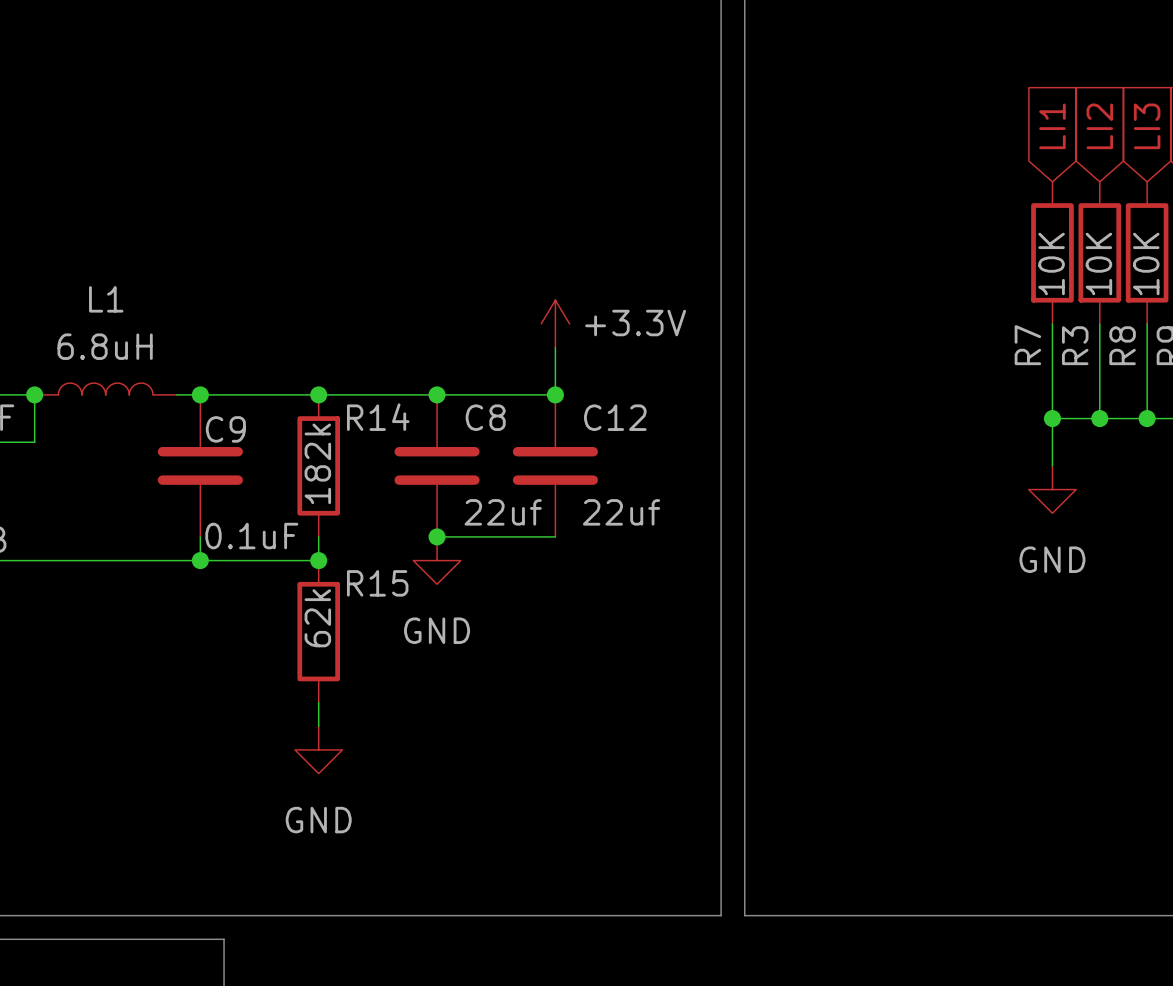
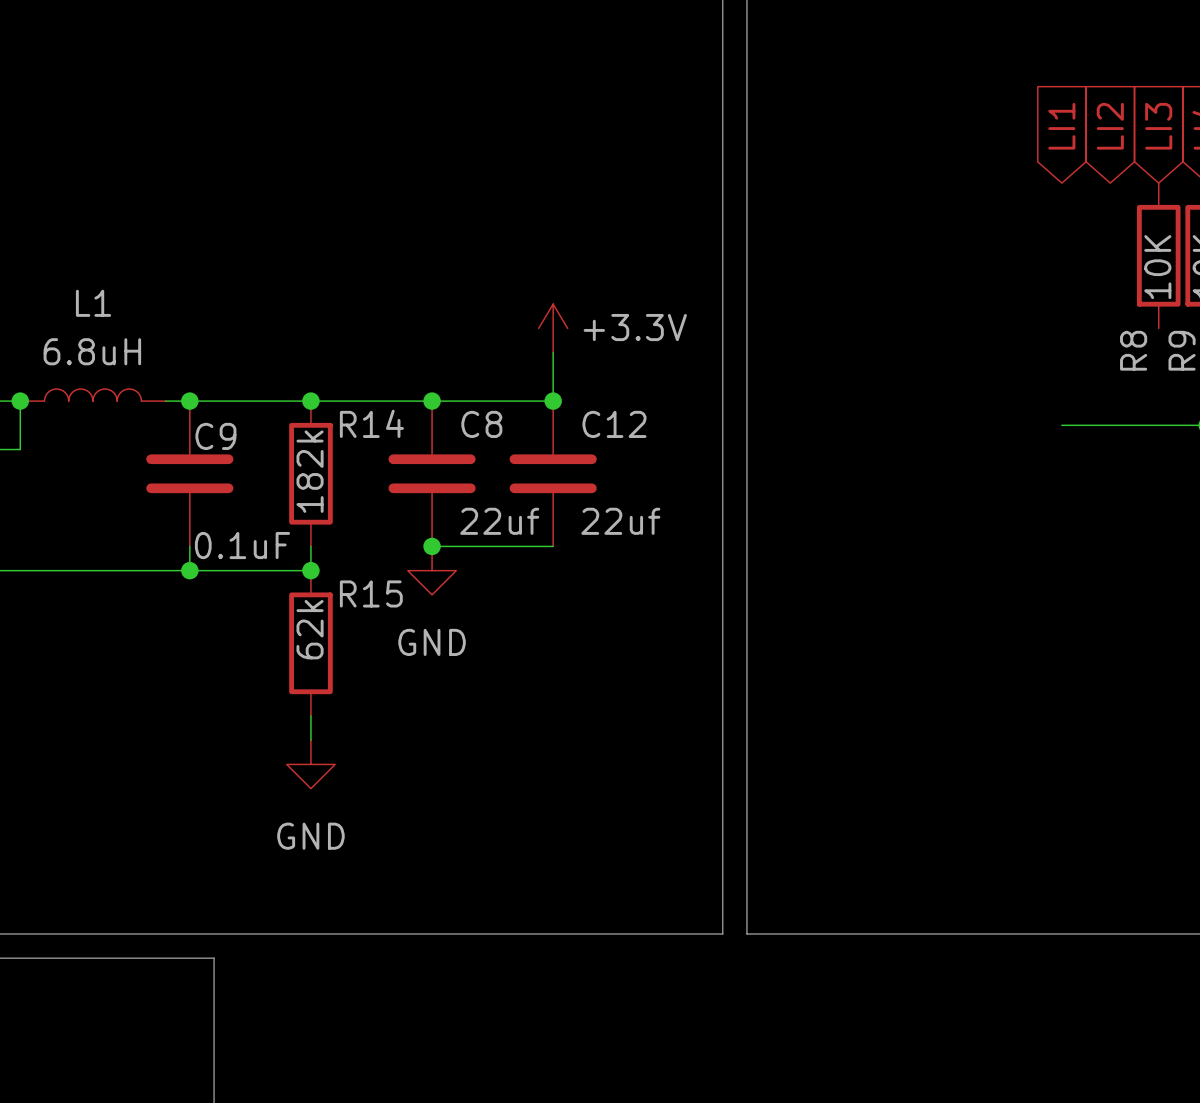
R7: 10K (1052, 252) -> none
R3: 10K (1099, 252) -> none
wire: (1052, 323) (1052, 465) -> none
wire: (1099, 323) (1099, 418) -> none
wire: (1147, 323) (1147, 418) -> none
junction: (1052, 418) -> none
junction: (1099, 418) -> none
junction: (1147, 418) -> none
power symbol: GND (1052, 489) -> none

